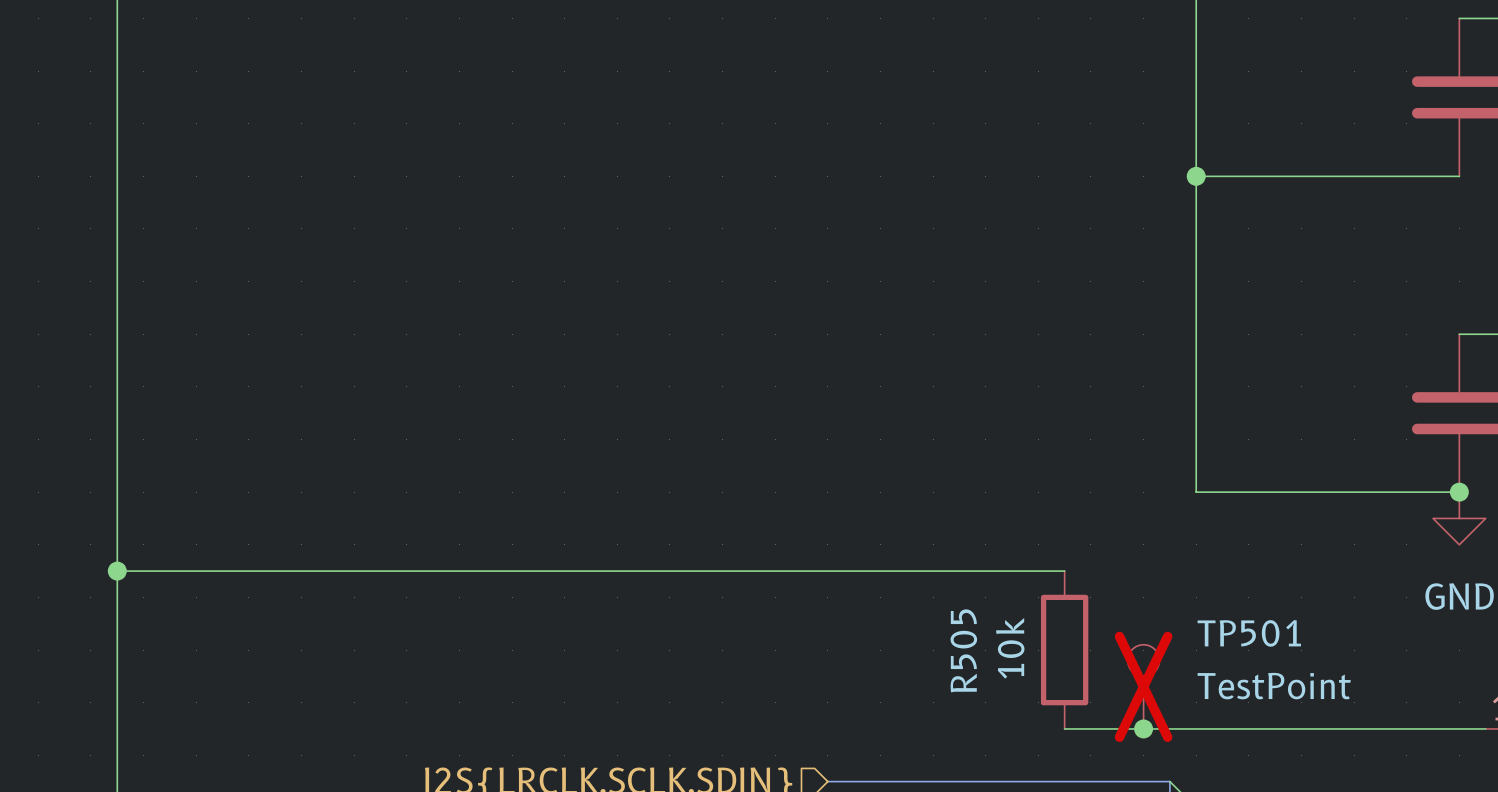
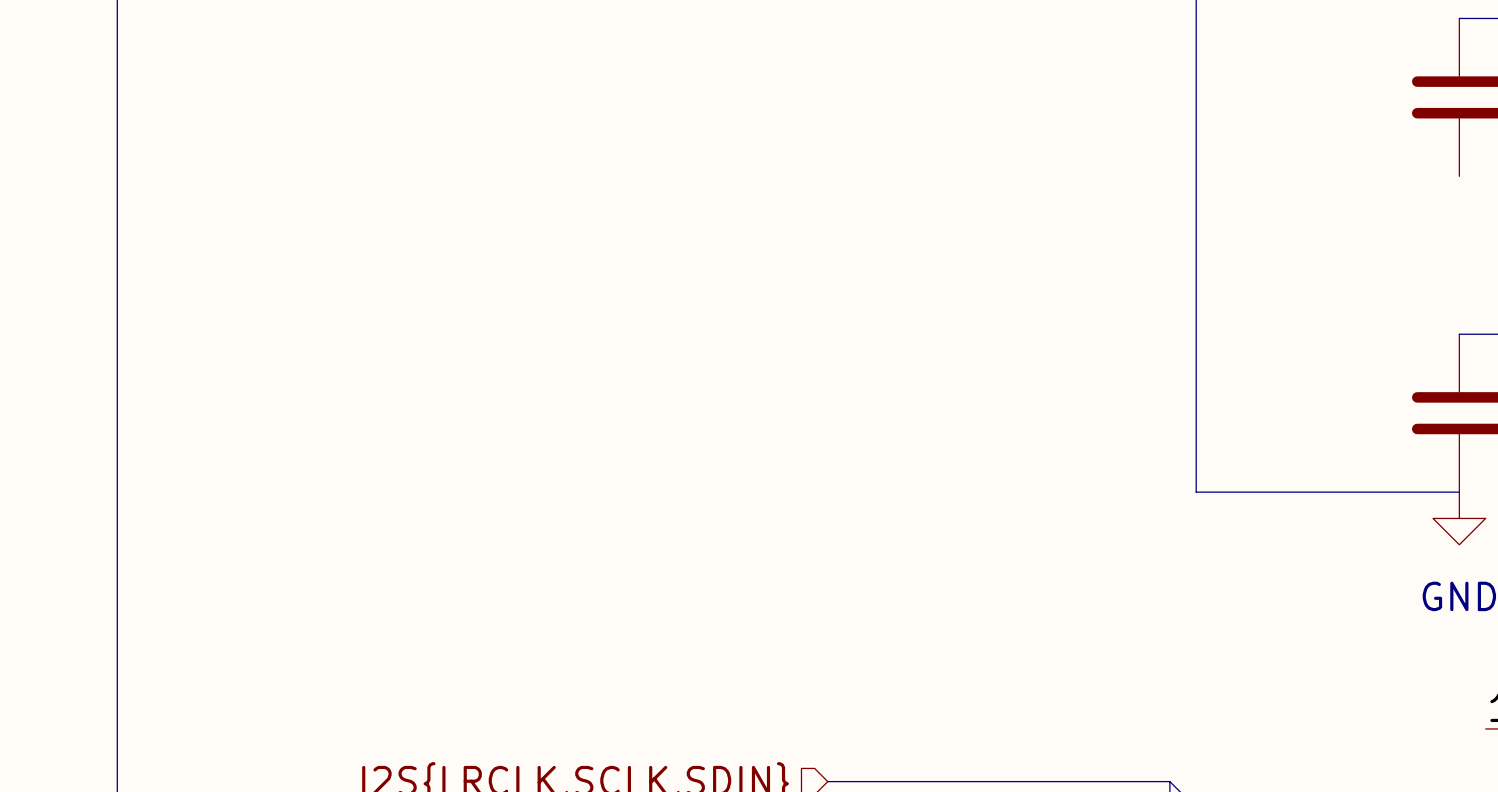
wire: (1196, 176) (1459, 176) -> none
junction: (1196, 176) -> none
junction: (1459, 492) -> none
wire: (117, 571) (1064, 571) -> none
junction: (117, 571) -> none
R505: 10k (1064, 650) -> none
TP501: TestPoint (1143, 686) -> none
wire: (1064, 728) (1485, 728) -> none
junction: (1143, 728) -> none

